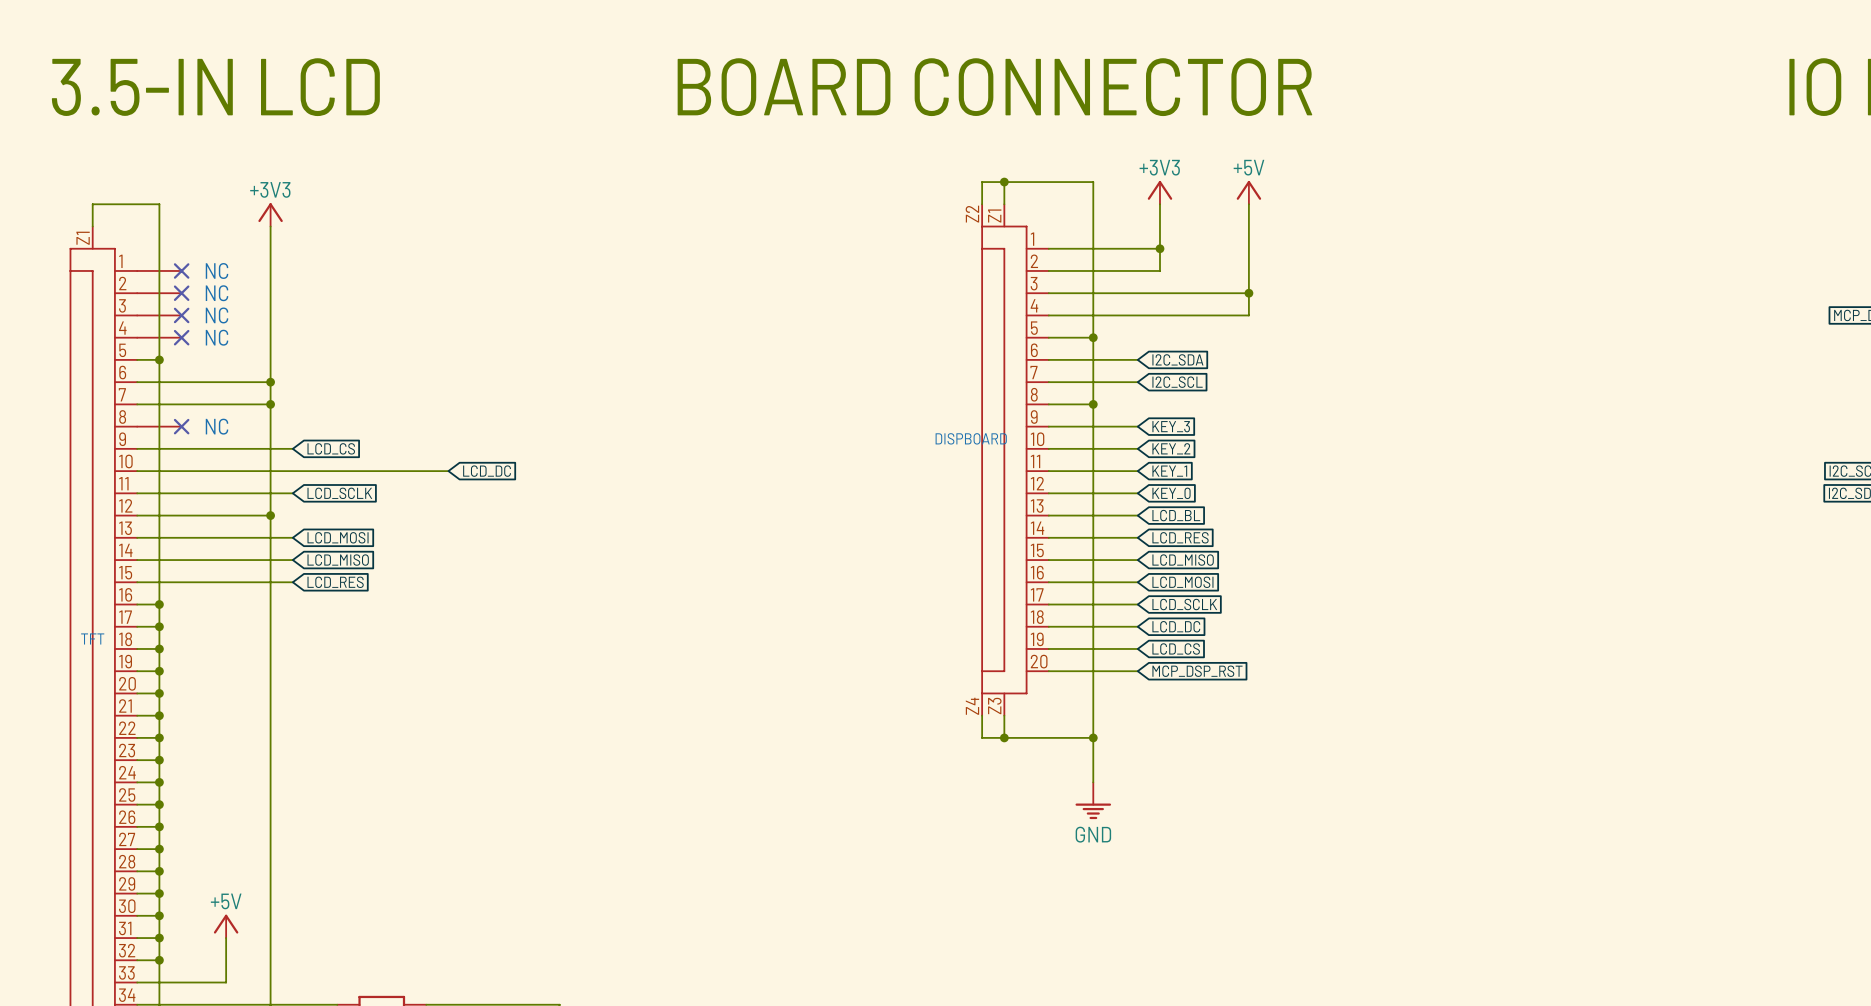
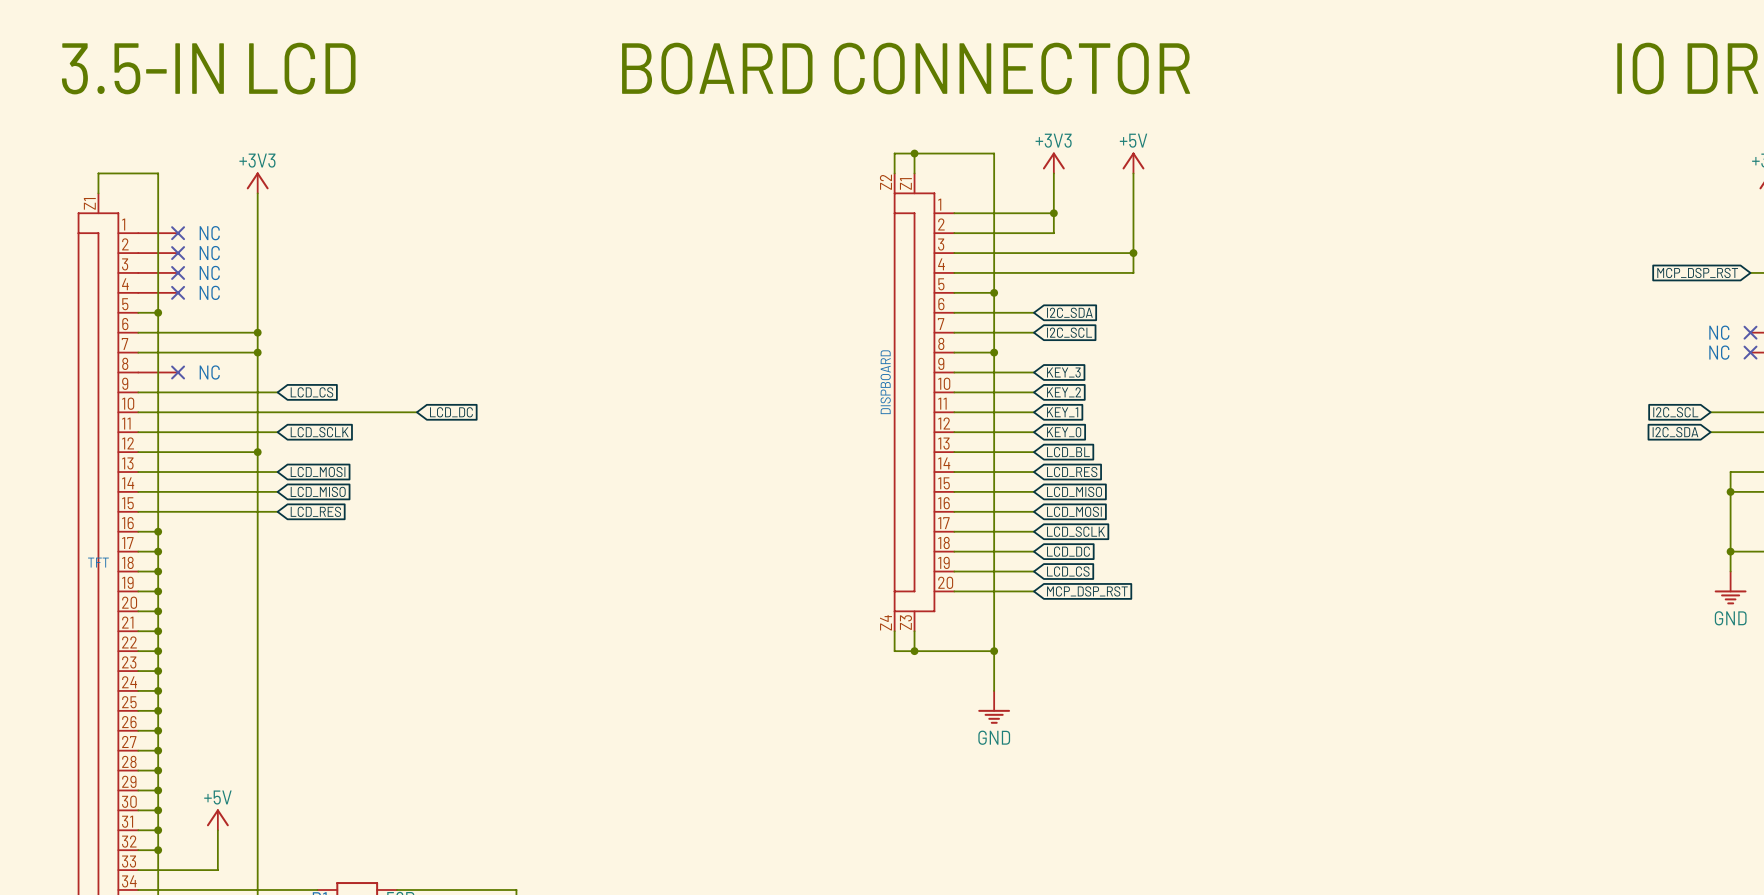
DISPBOARD name rotation: 0° (971, 438) -> 90° counterclockwise (885, 382)

